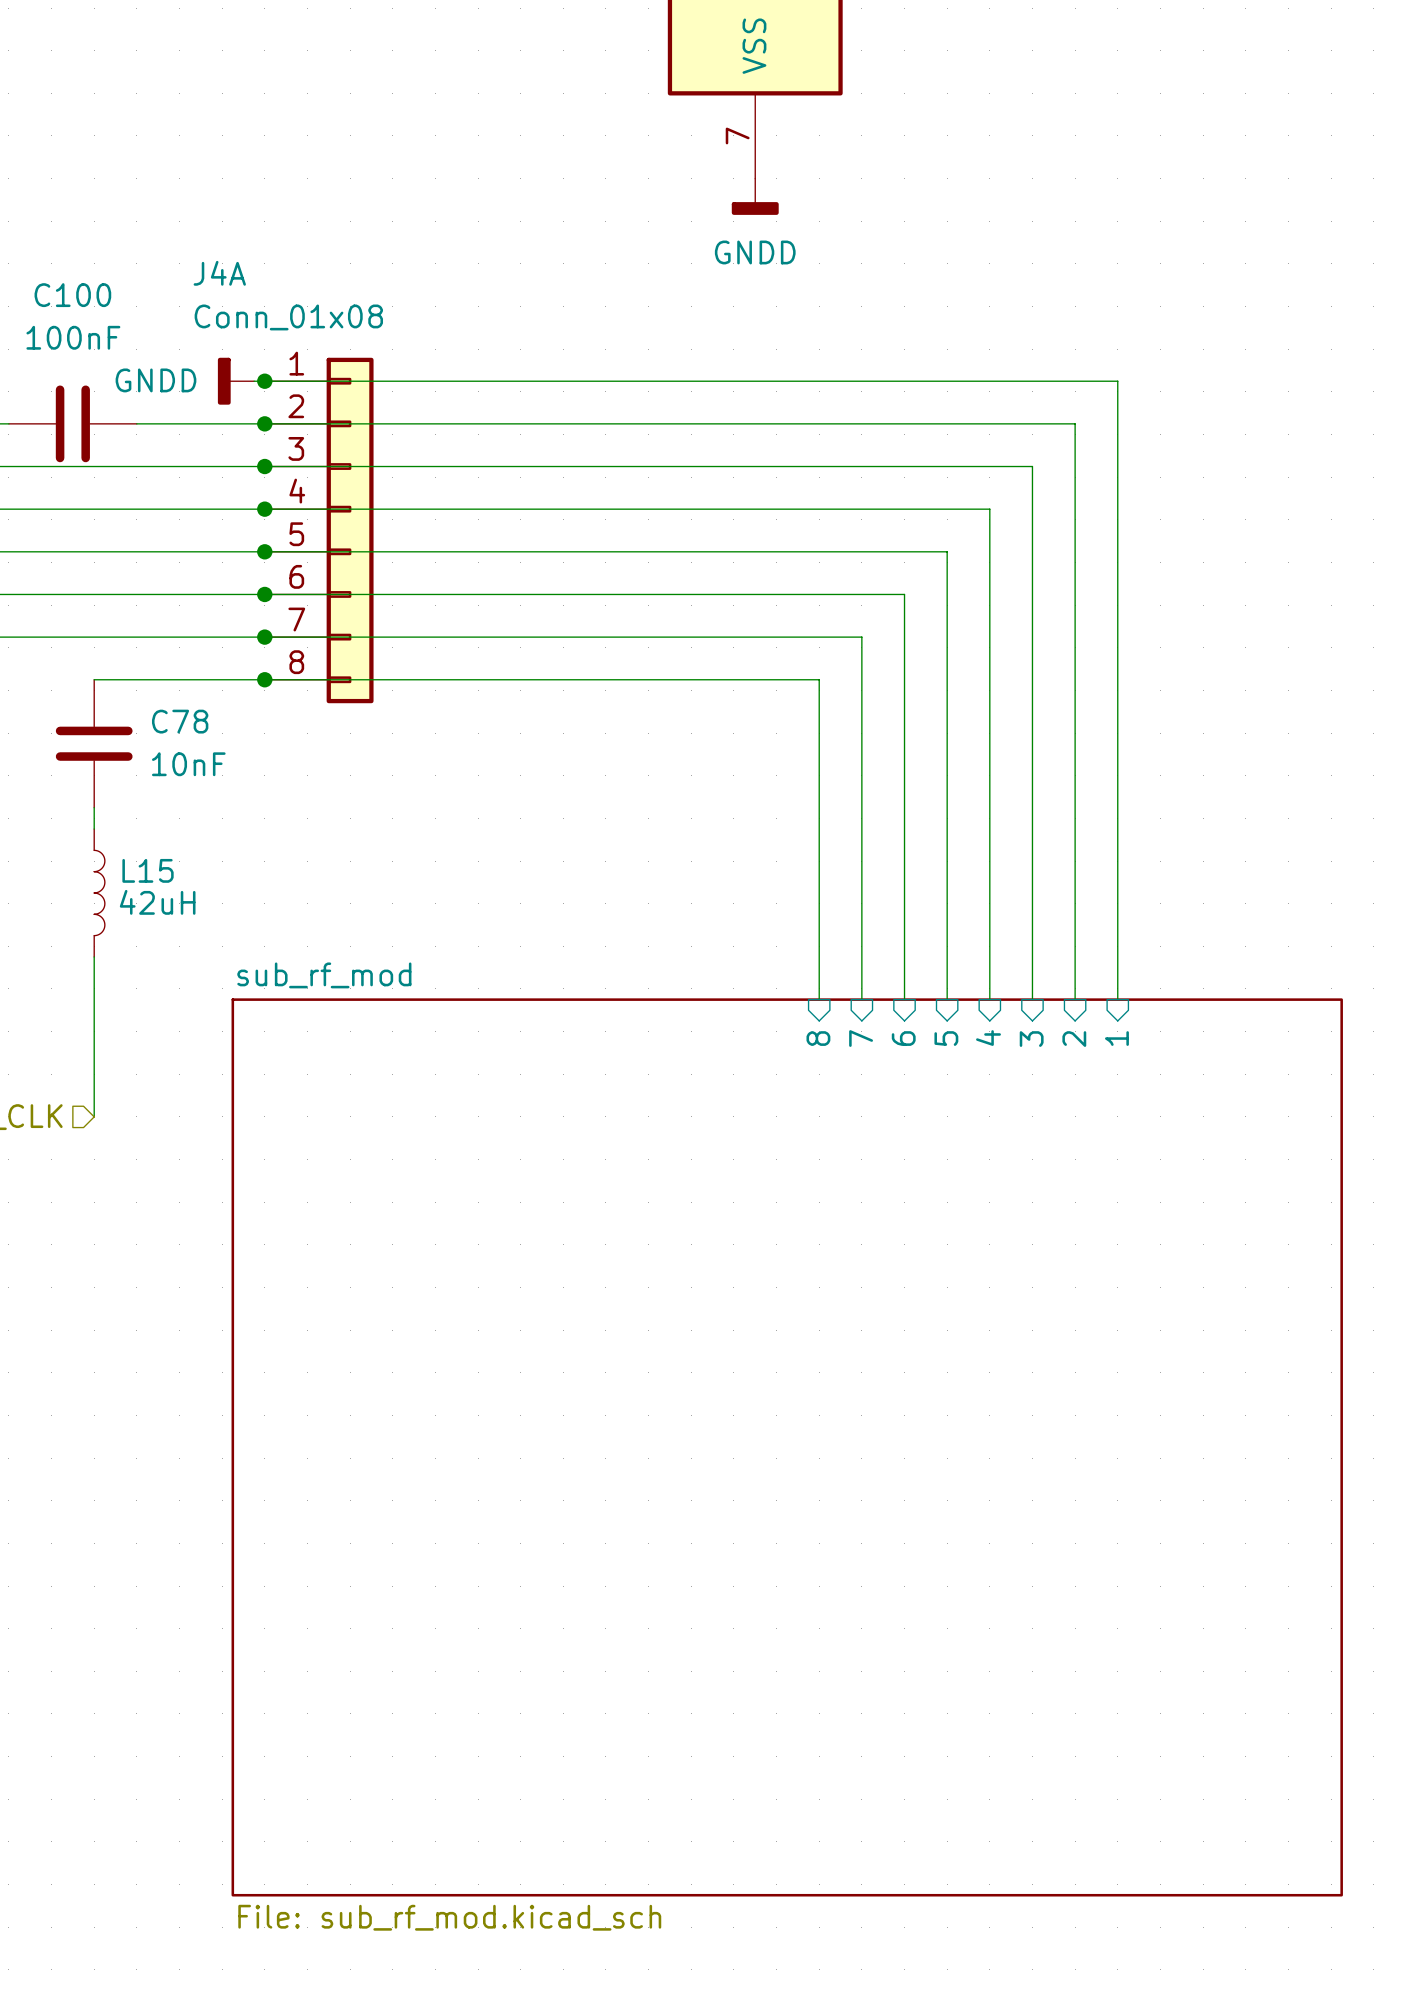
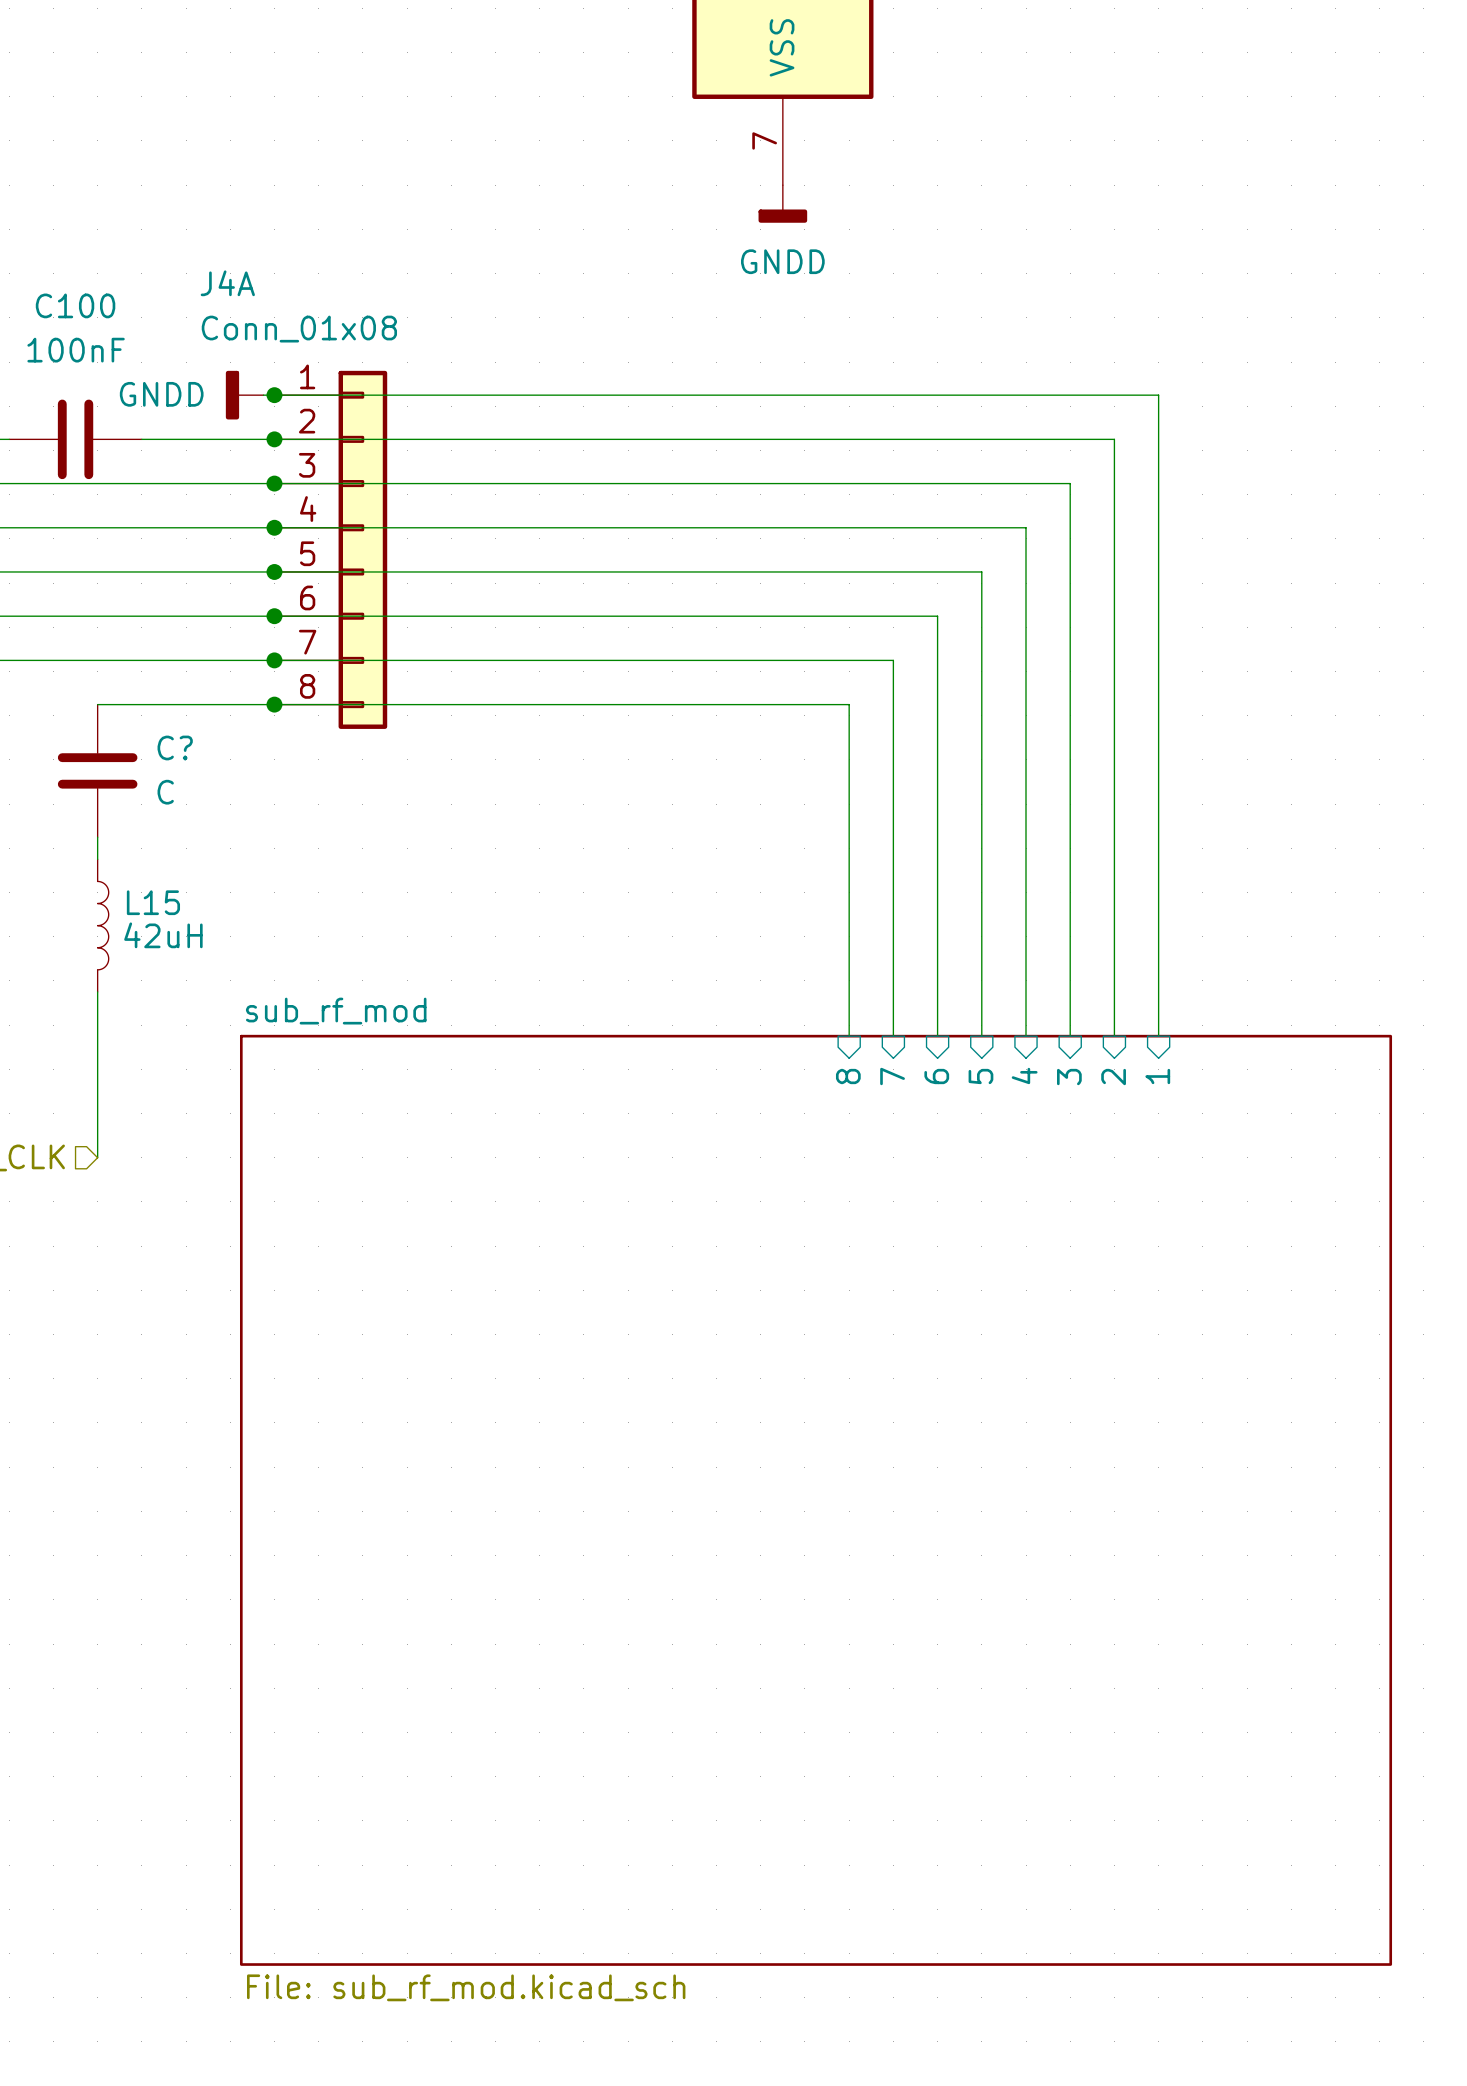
C78 name: C78 (180, 721) -> C? (175, 747)
C78 value: 10nF (188, 764) -> C (165, 792)

